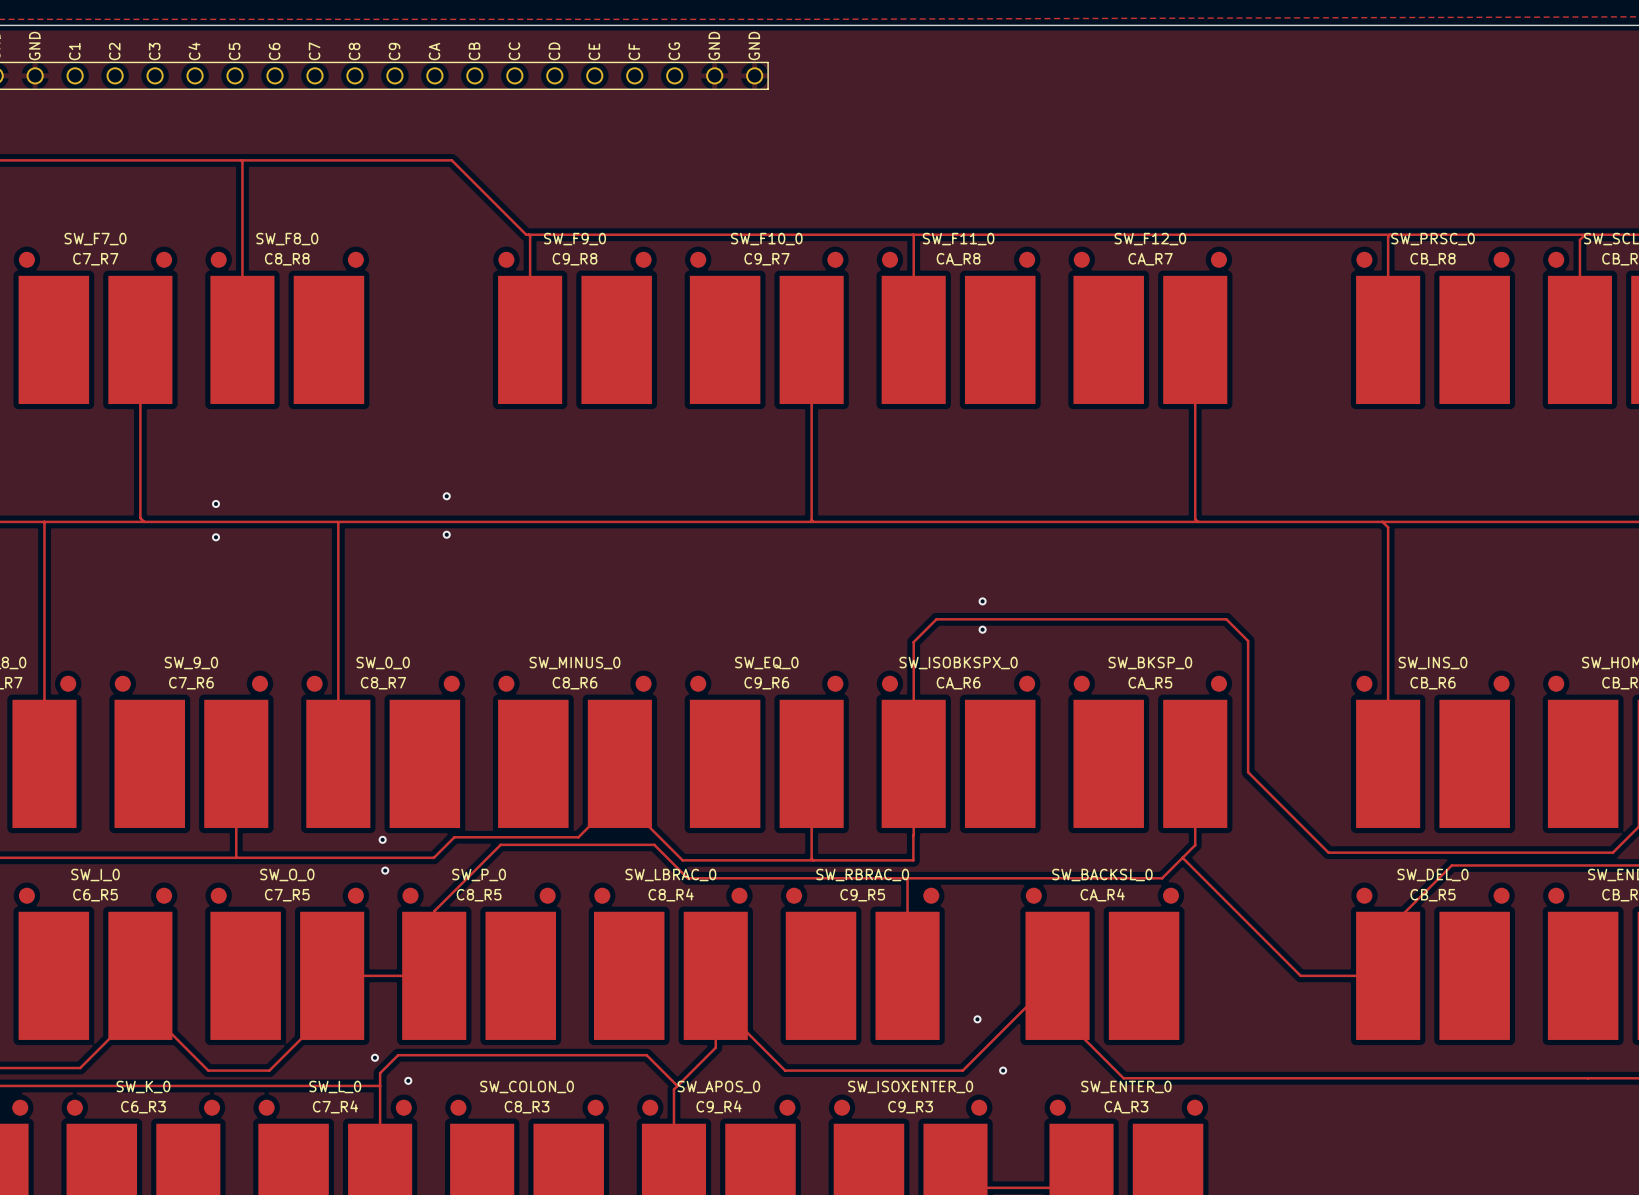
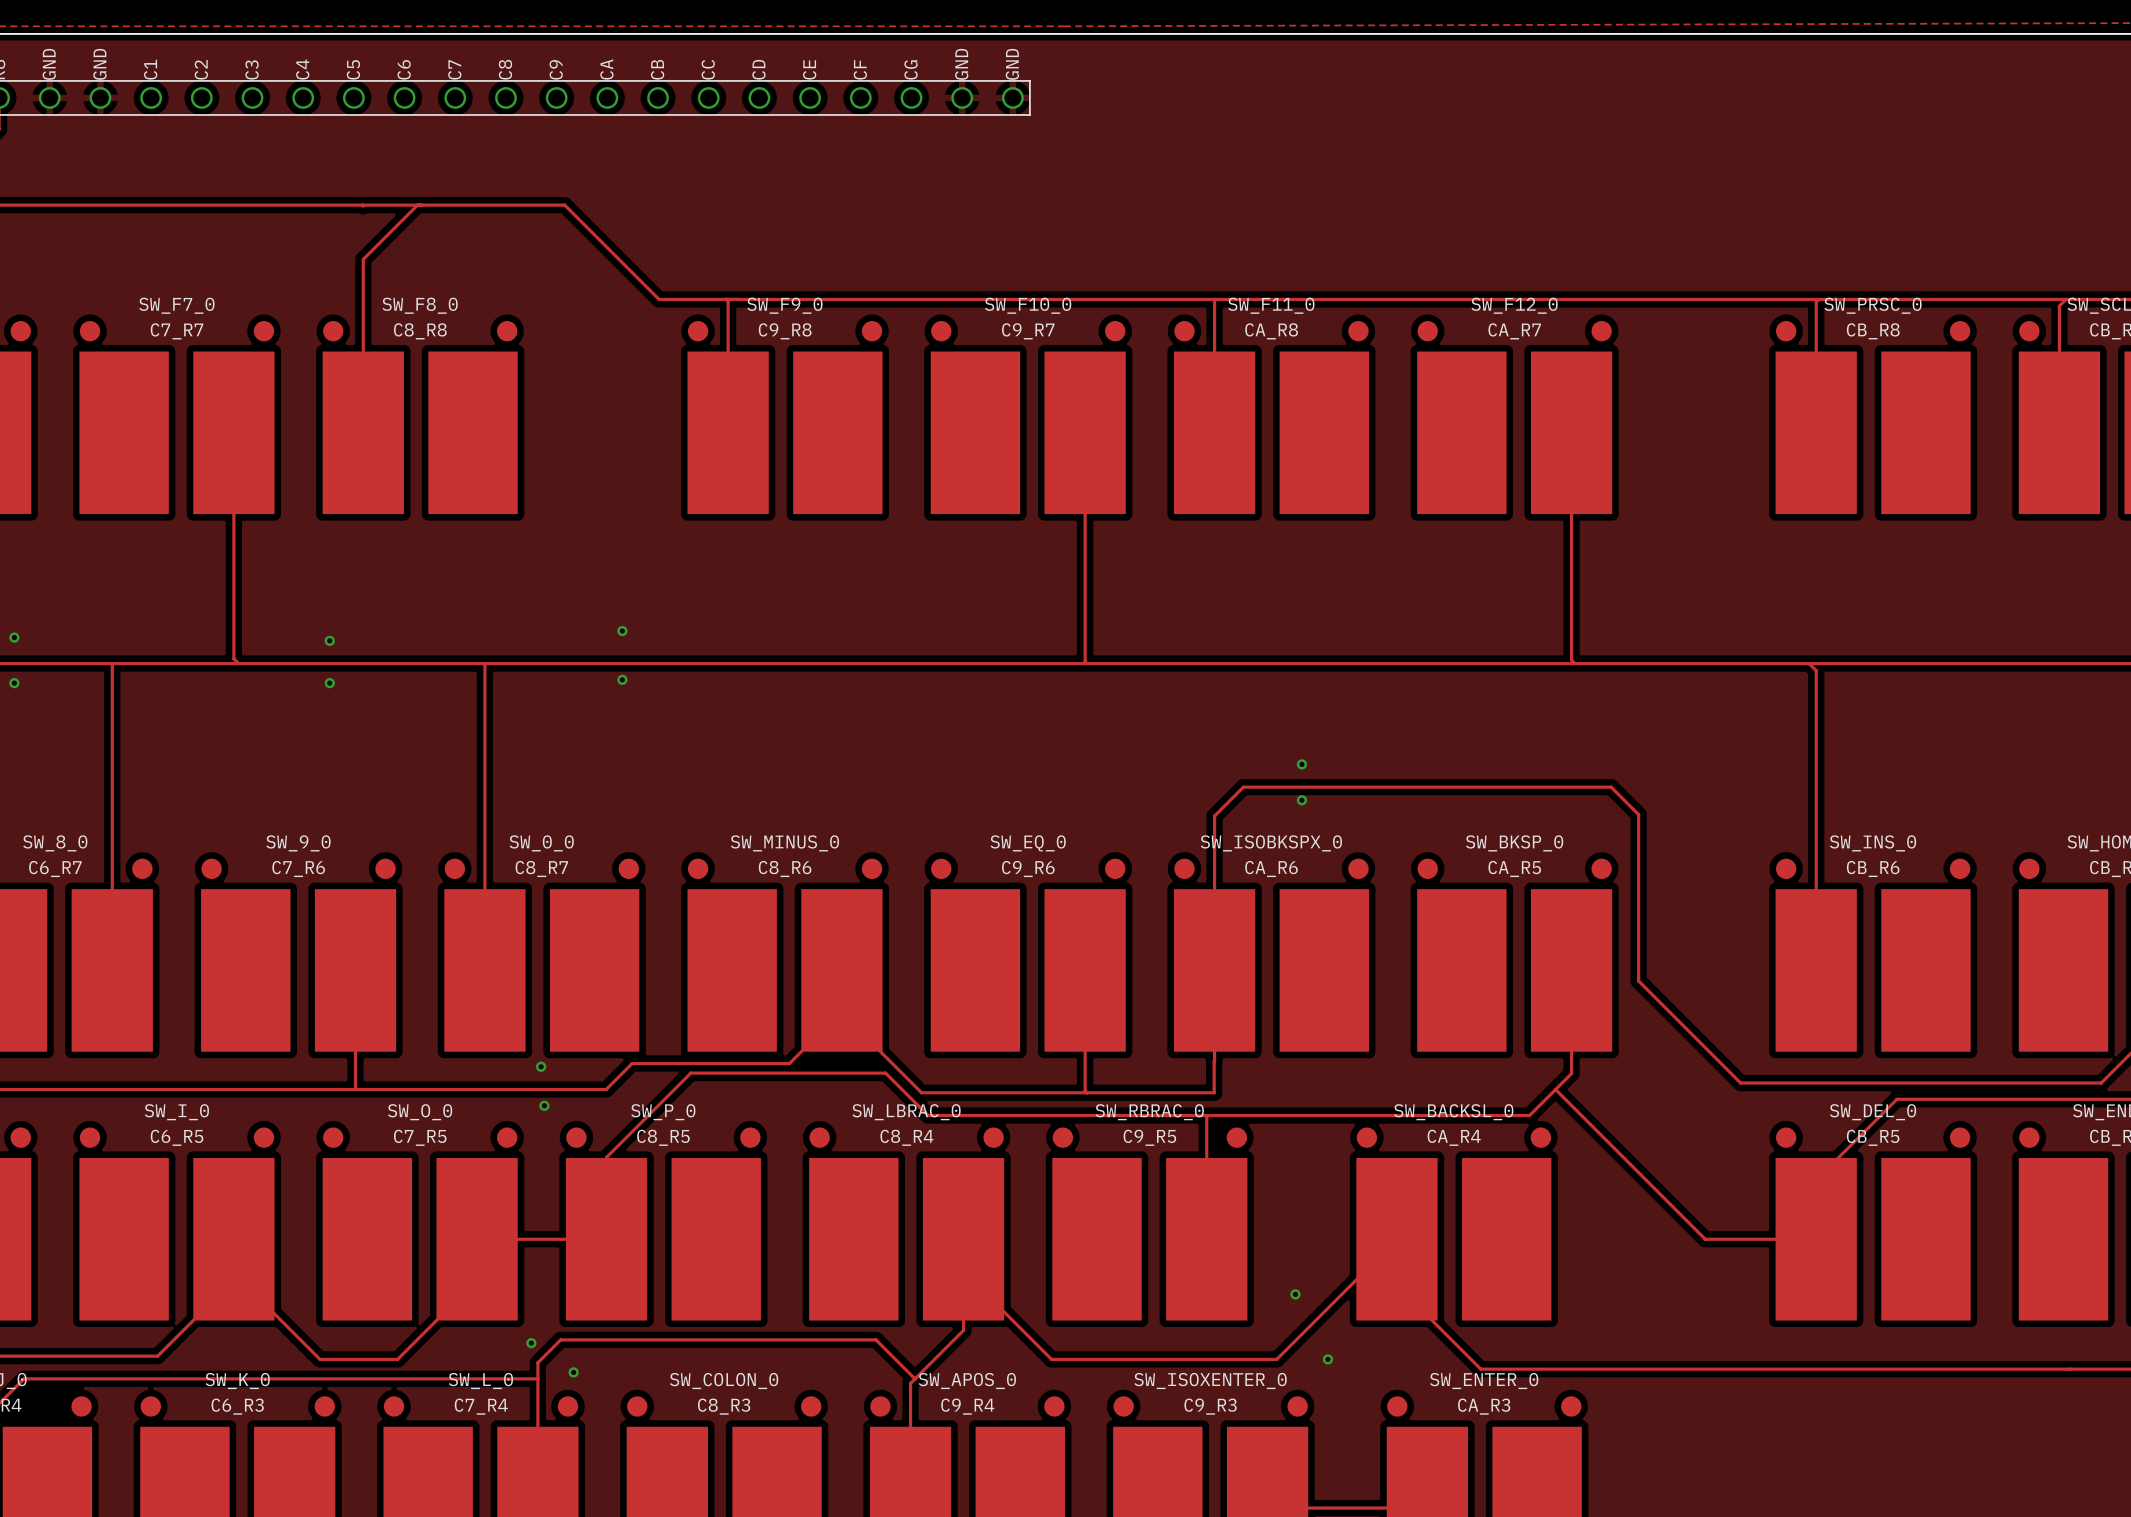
track: (401, 160) (451, 160) (526, 234) -> (564, 205) (659, 299) (723, 299)
track: (242, 161) (242, 203) -> (417, 205) (363, 259)

